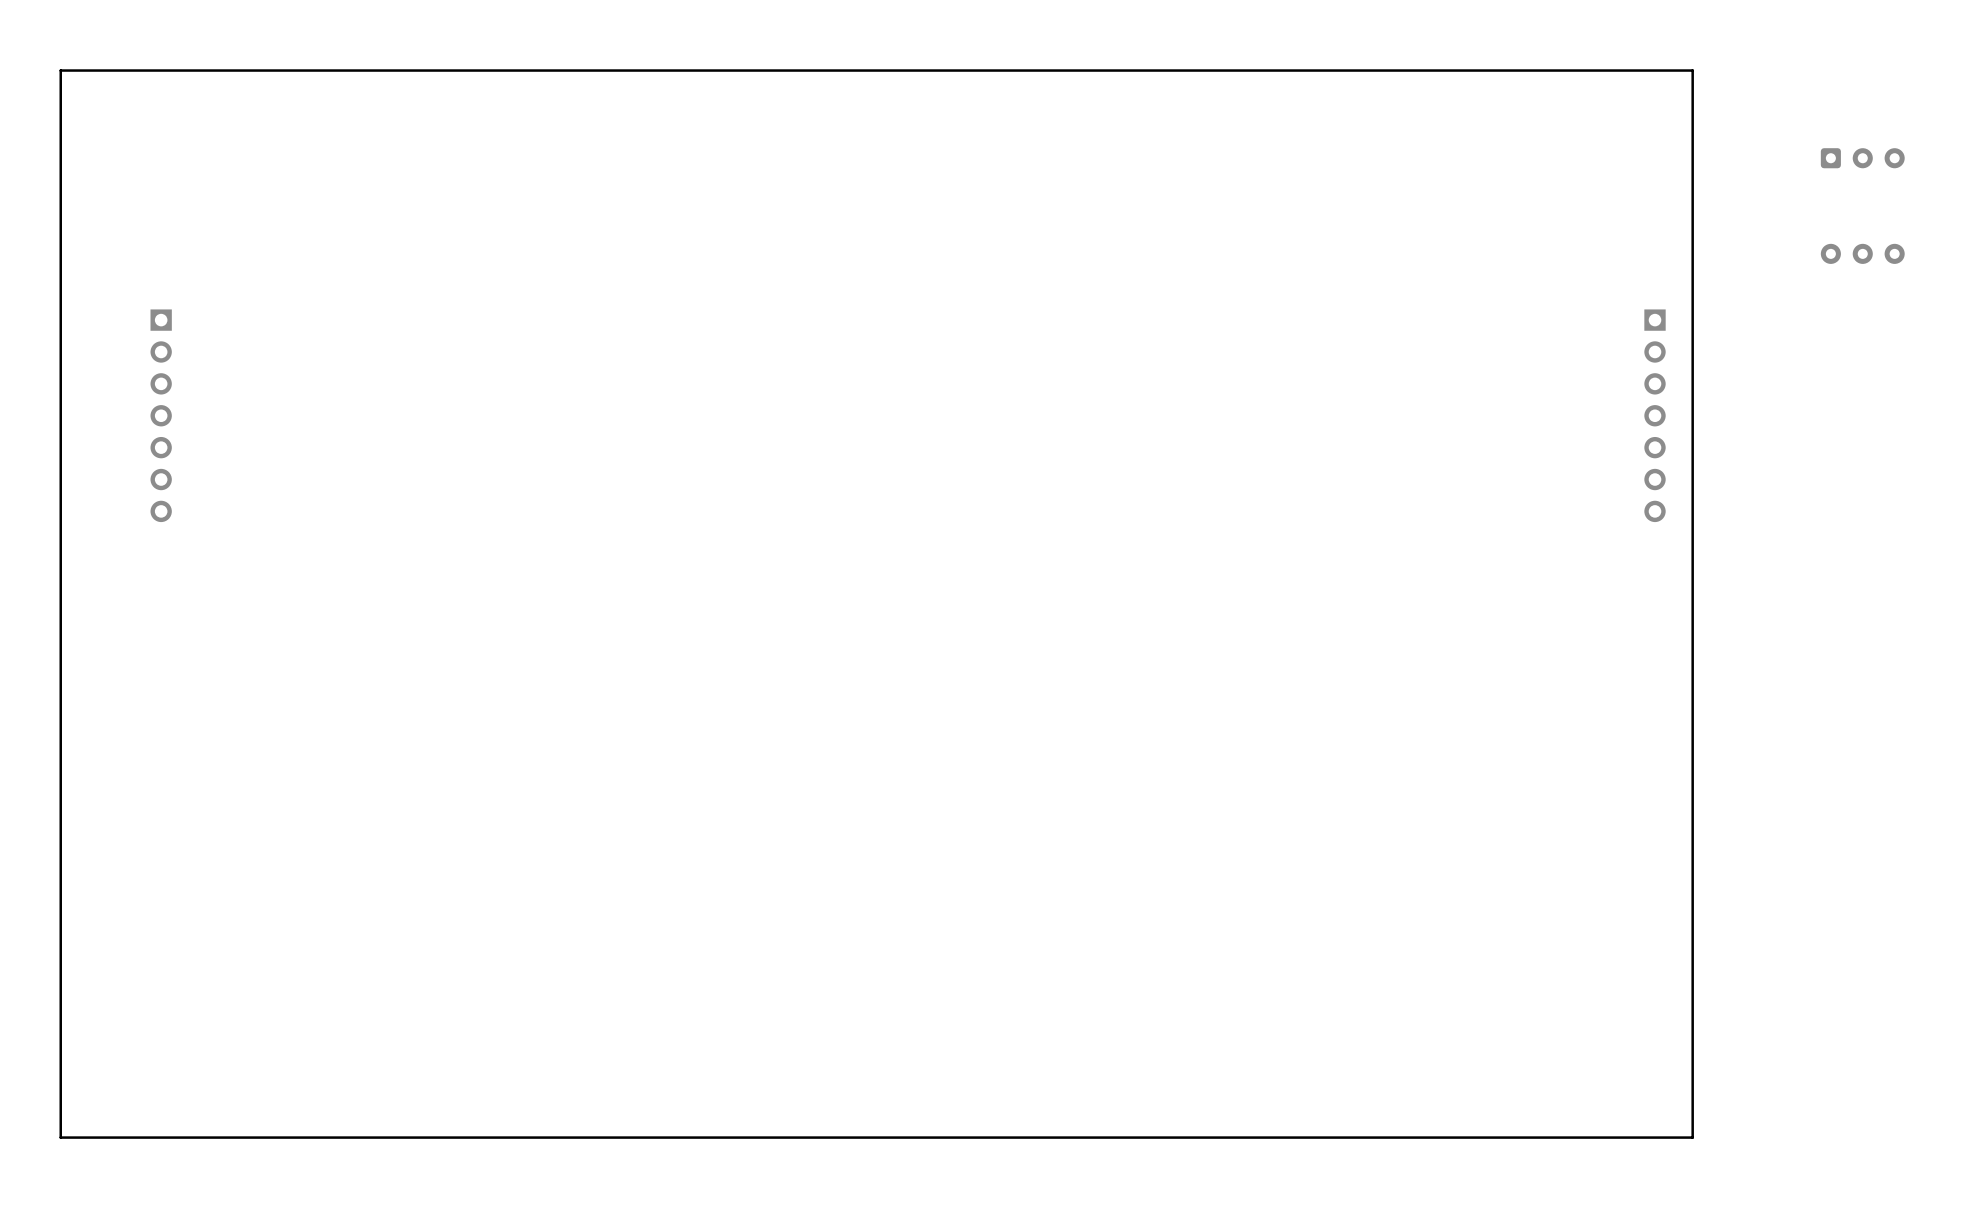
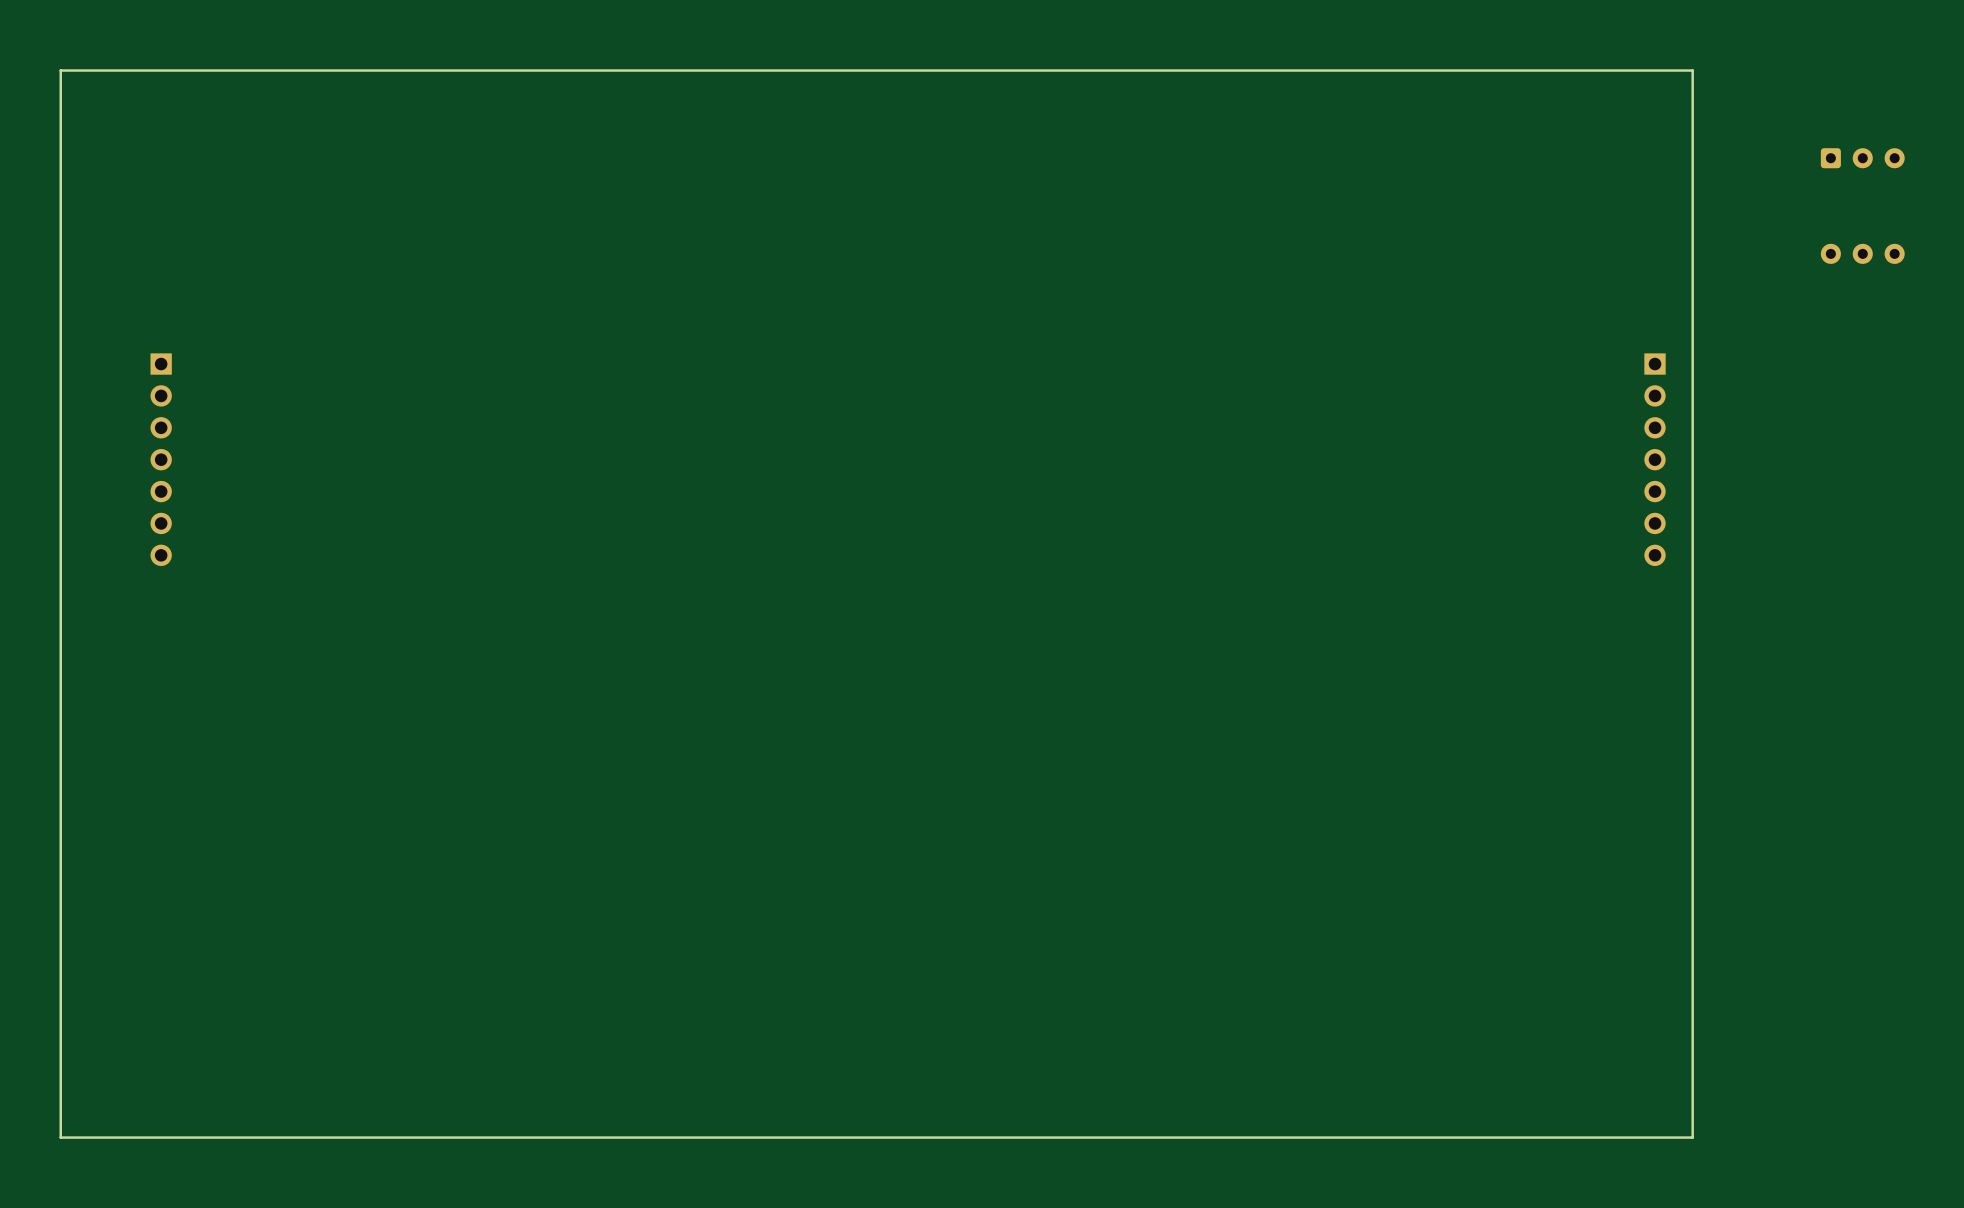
part position: (161, 415) -> (161, 459)
part position: (1655, 415) -> (1655, 459)

